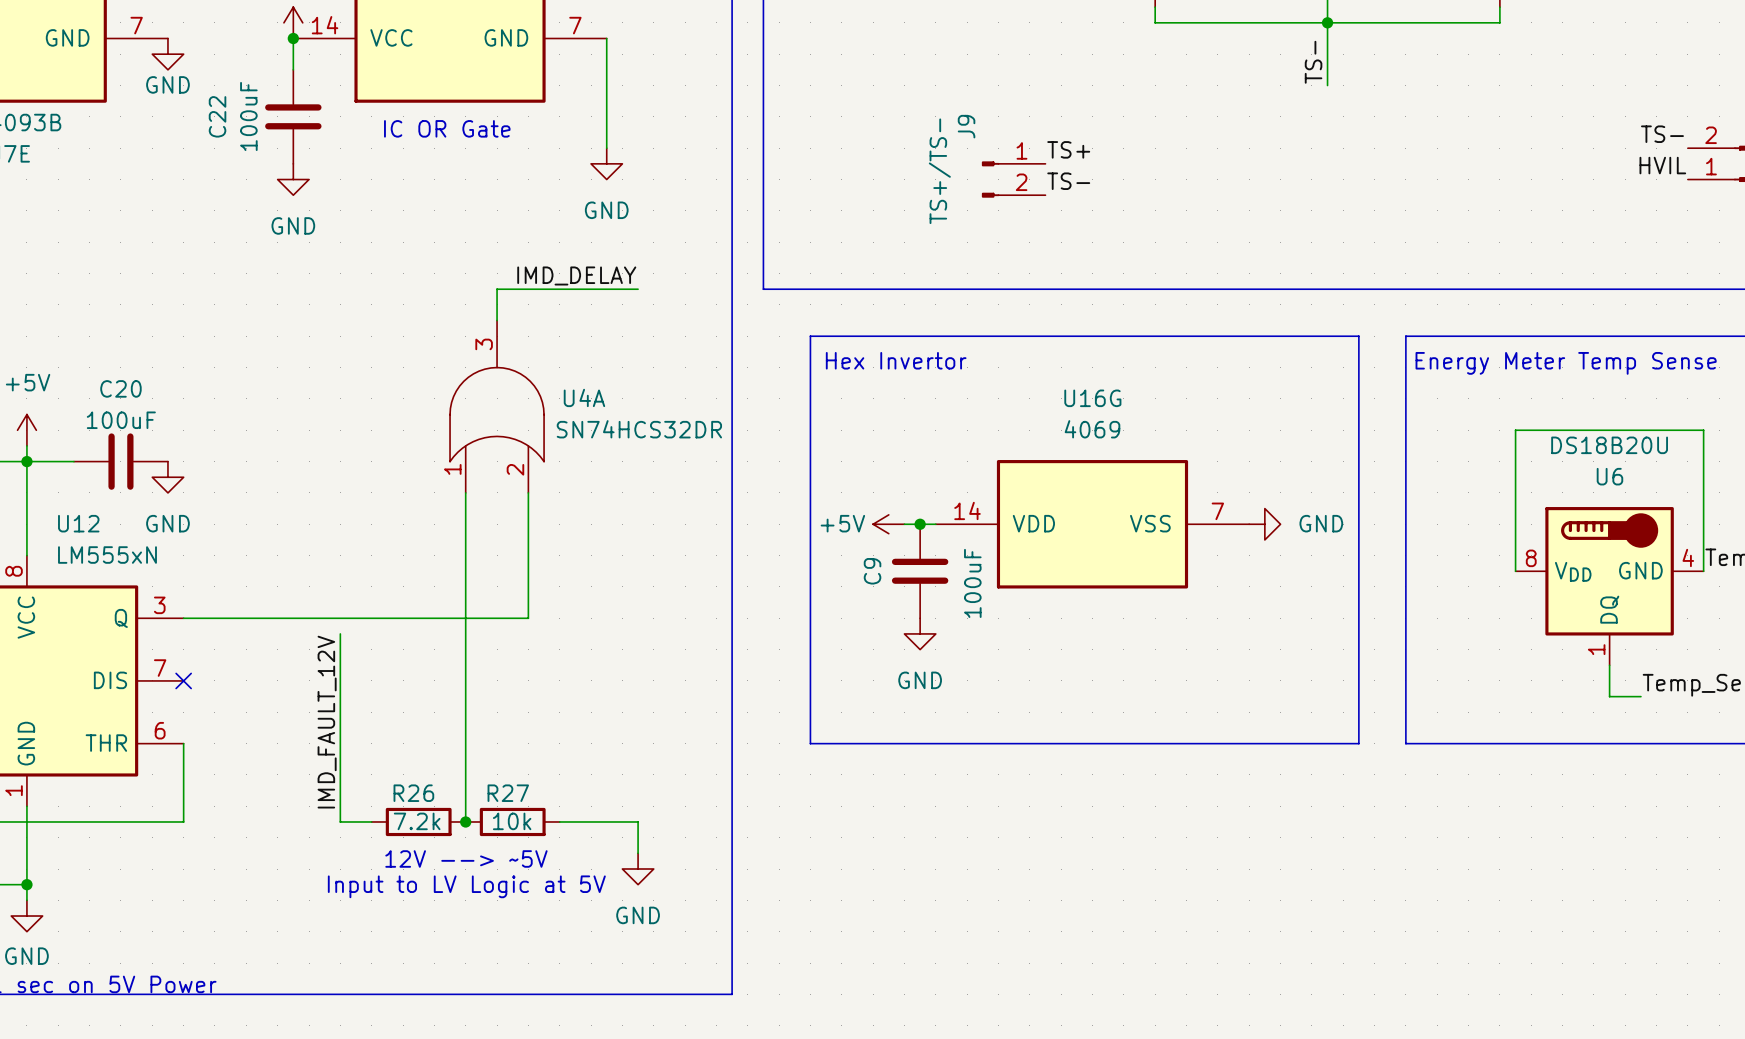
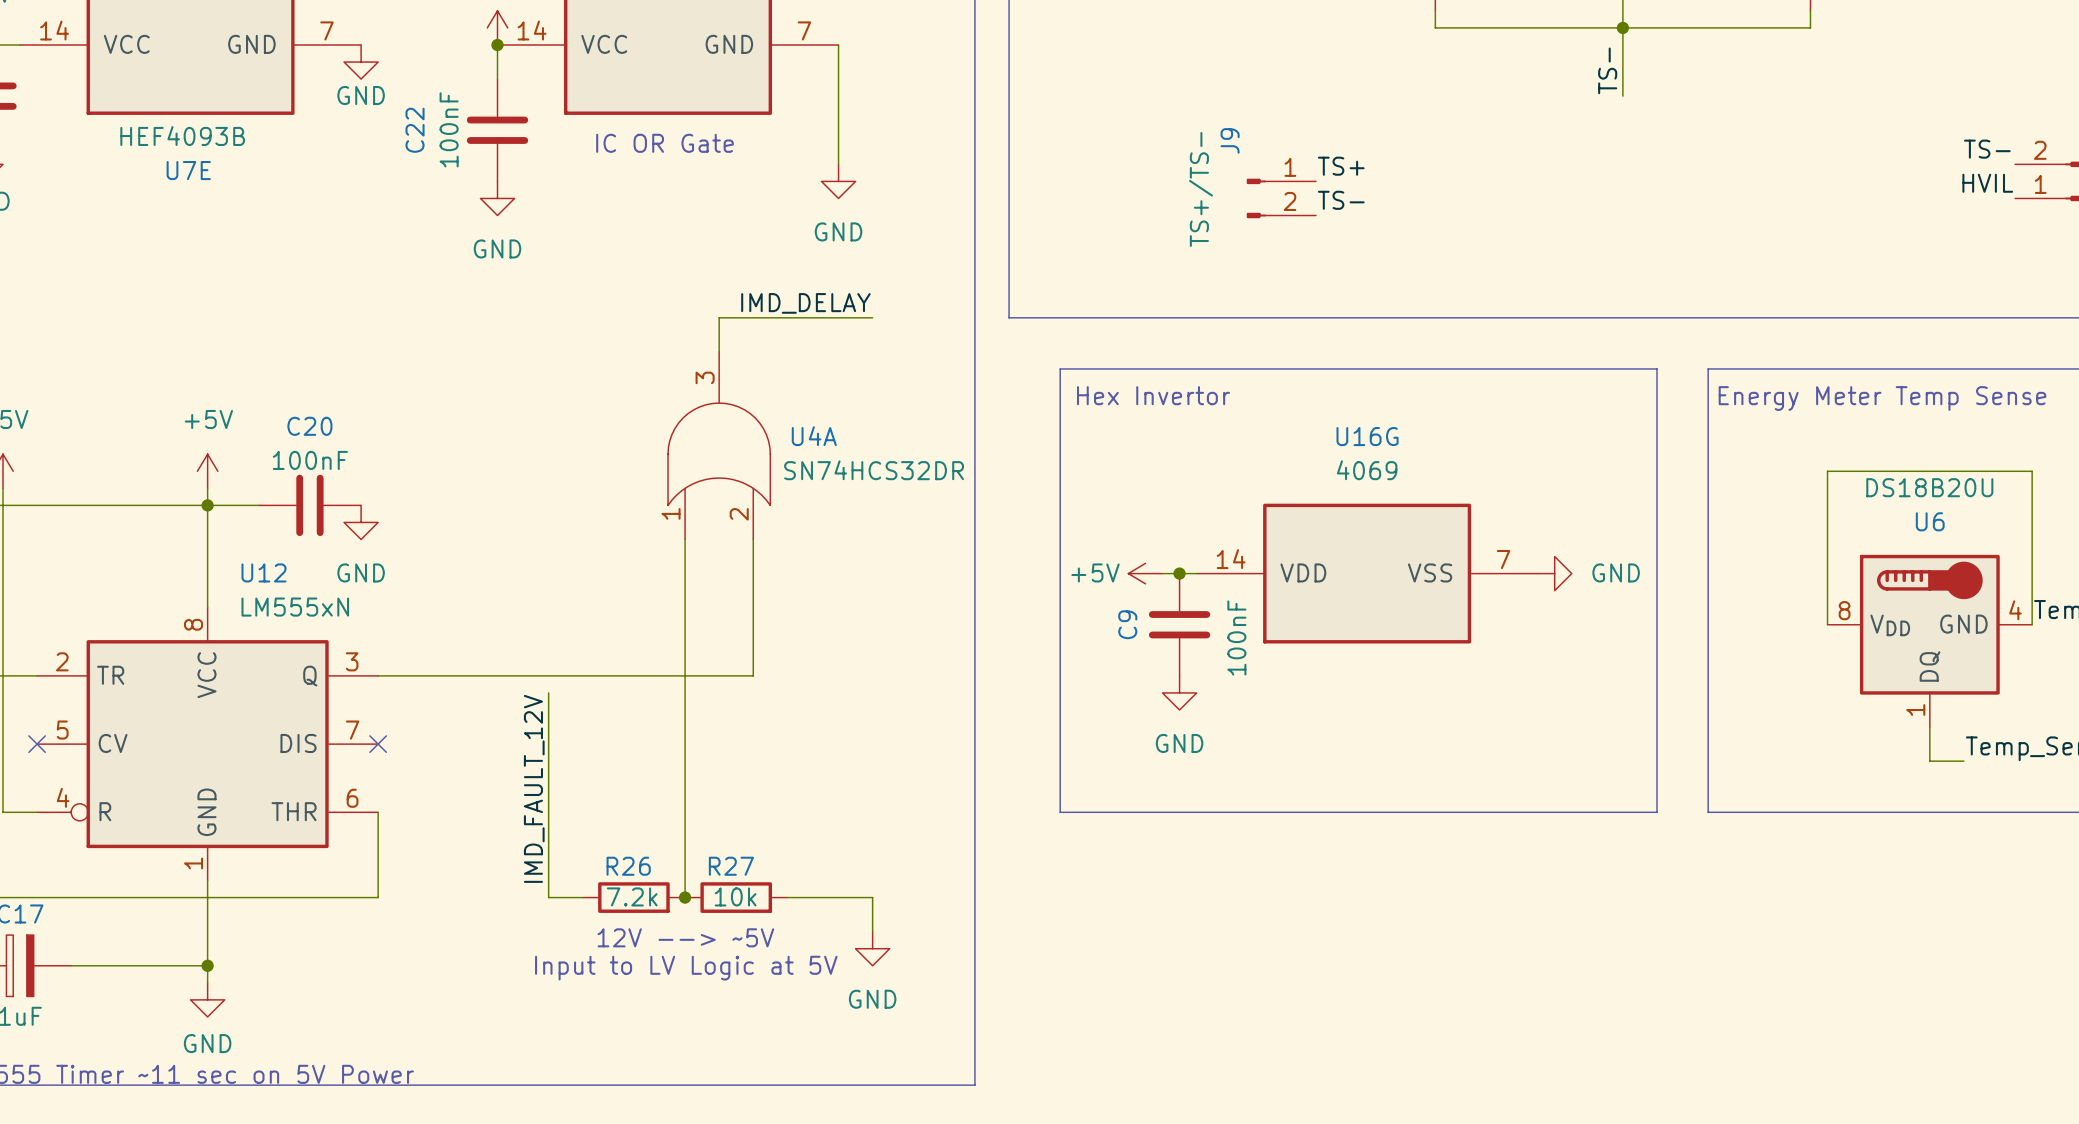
C22 value: 100uF (248, 116) -> 100nF (449, 129)
C20 value: 100uF (121, 420) -> 100nF (310, 460)
C9 value: 100uF (972, 583) -> 100nF (1236, 637)

